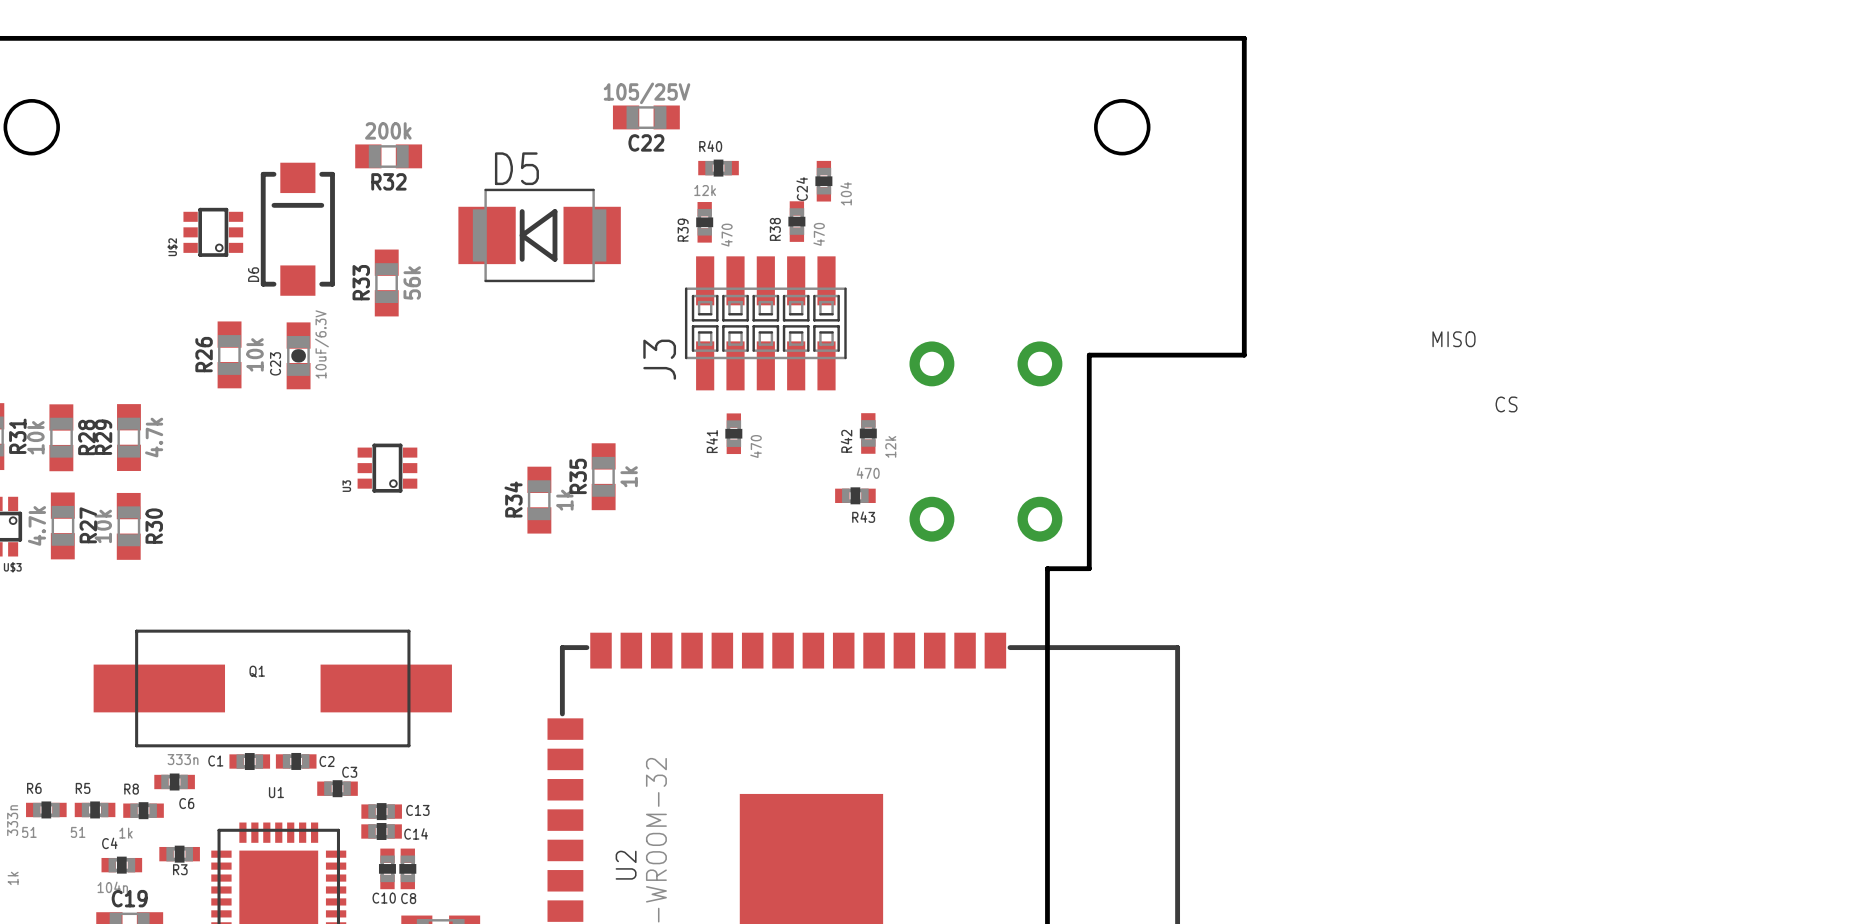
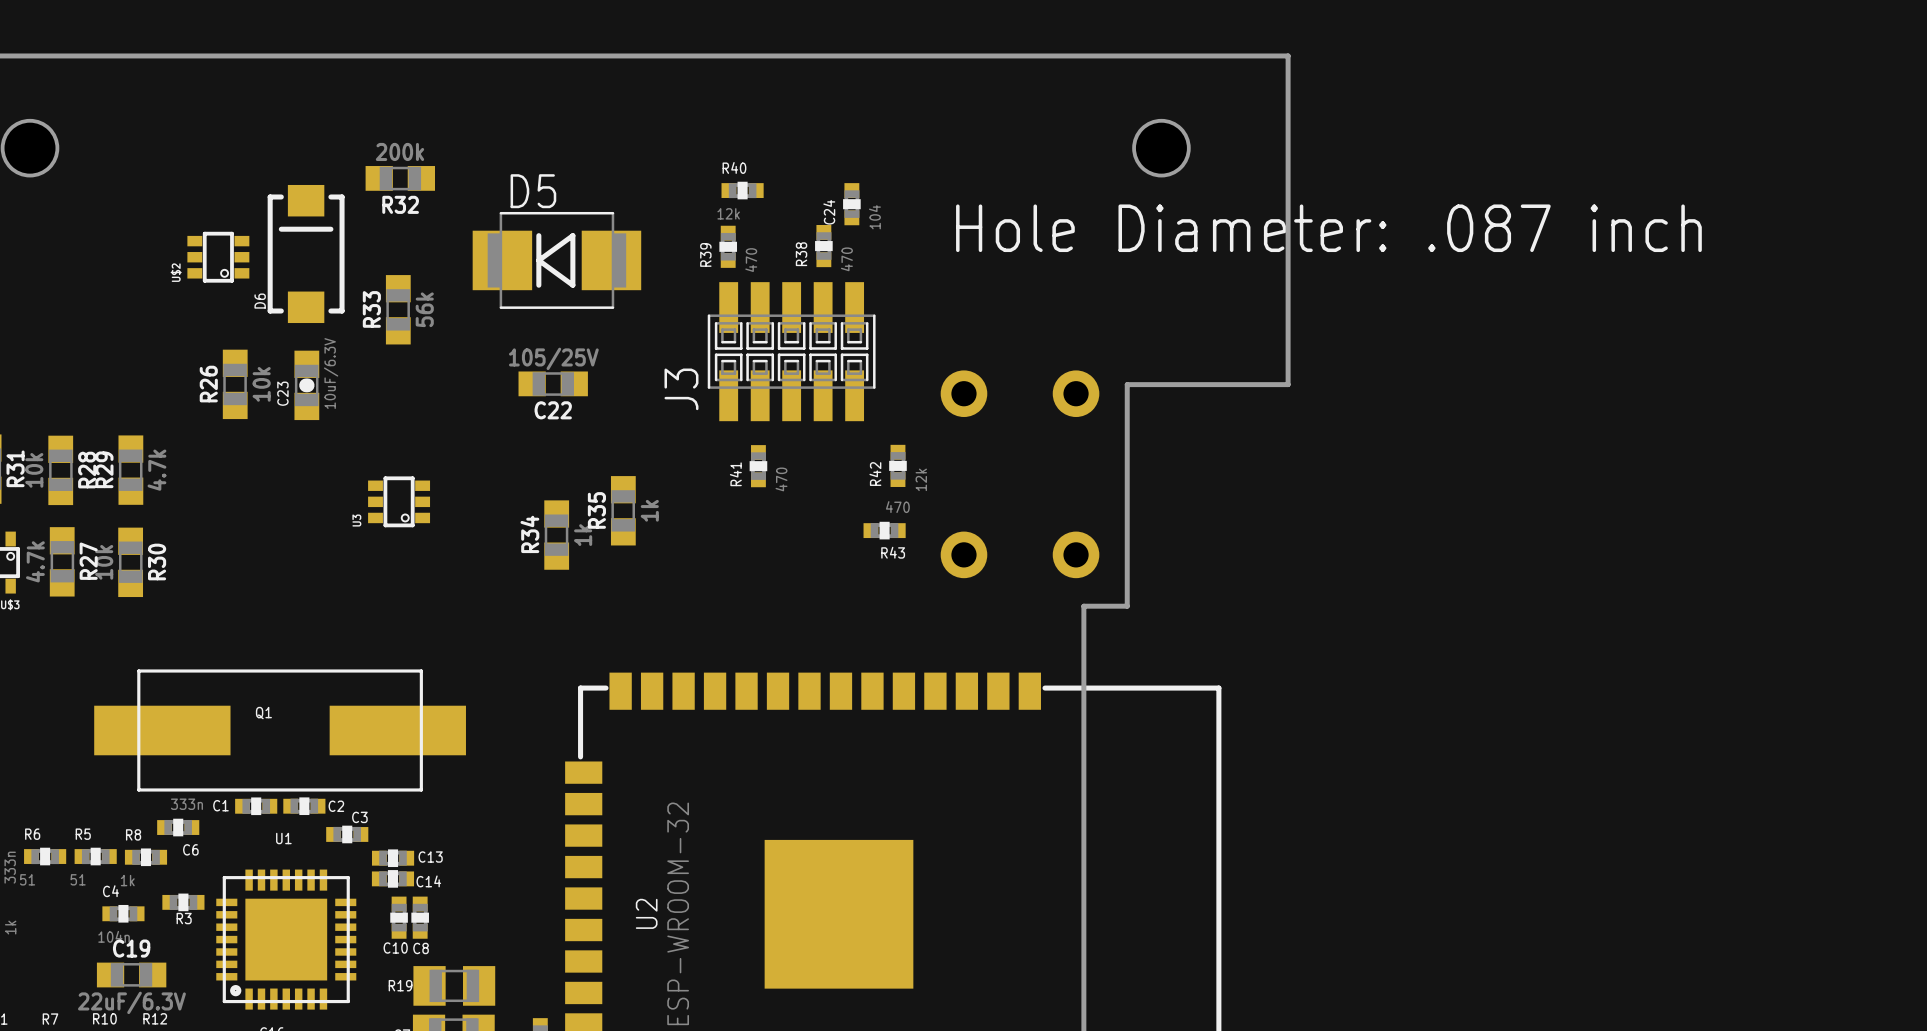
C22 position: (646, 117) -> (553, 383)
text: none -> Hole Diameter: .087 inch (1328, 228)
text: MISO (1453, 339) -> none
text: CS (1506, 404) -> none

